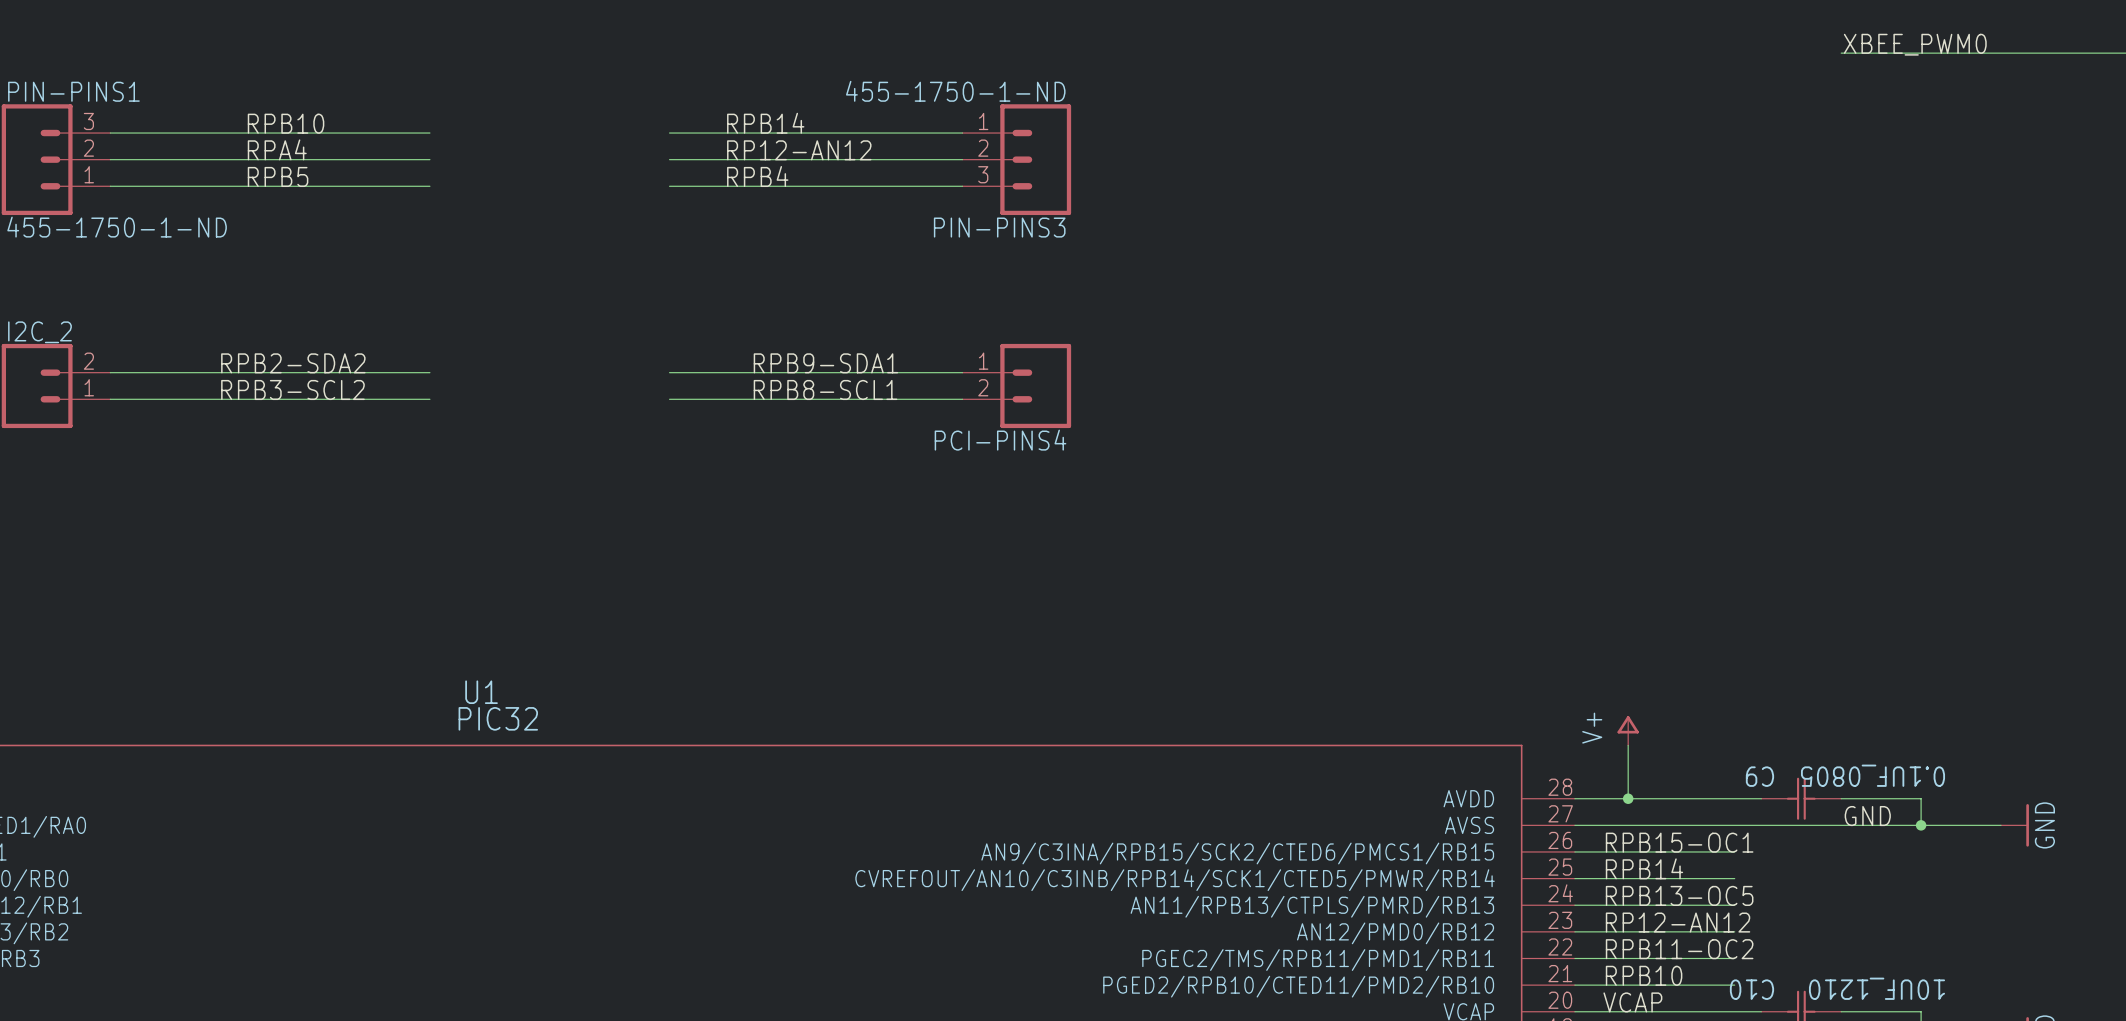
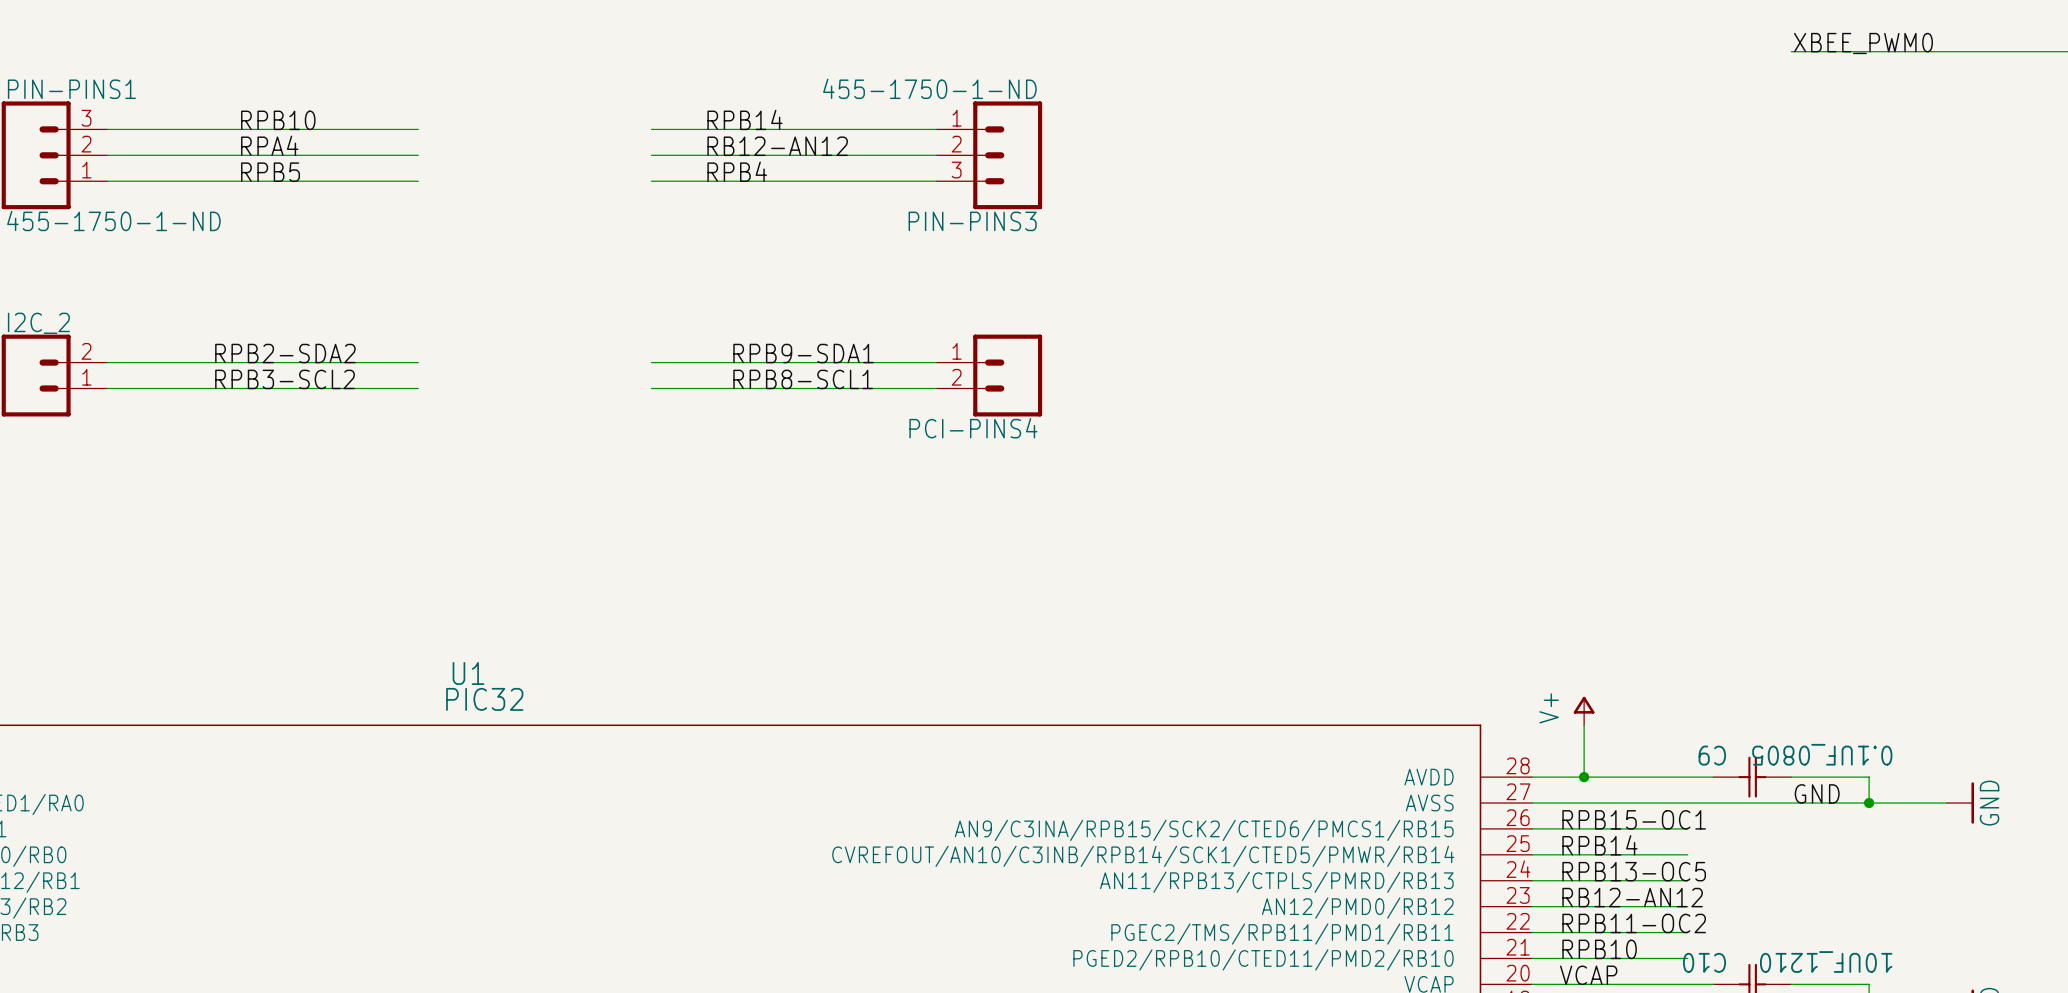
label: RP12-AN12 (799, 150) -> RB12-AN12 (777, 146)
label: RP12-AN12 (1678, 922) -> RB12-AN12 (1632, 897)

